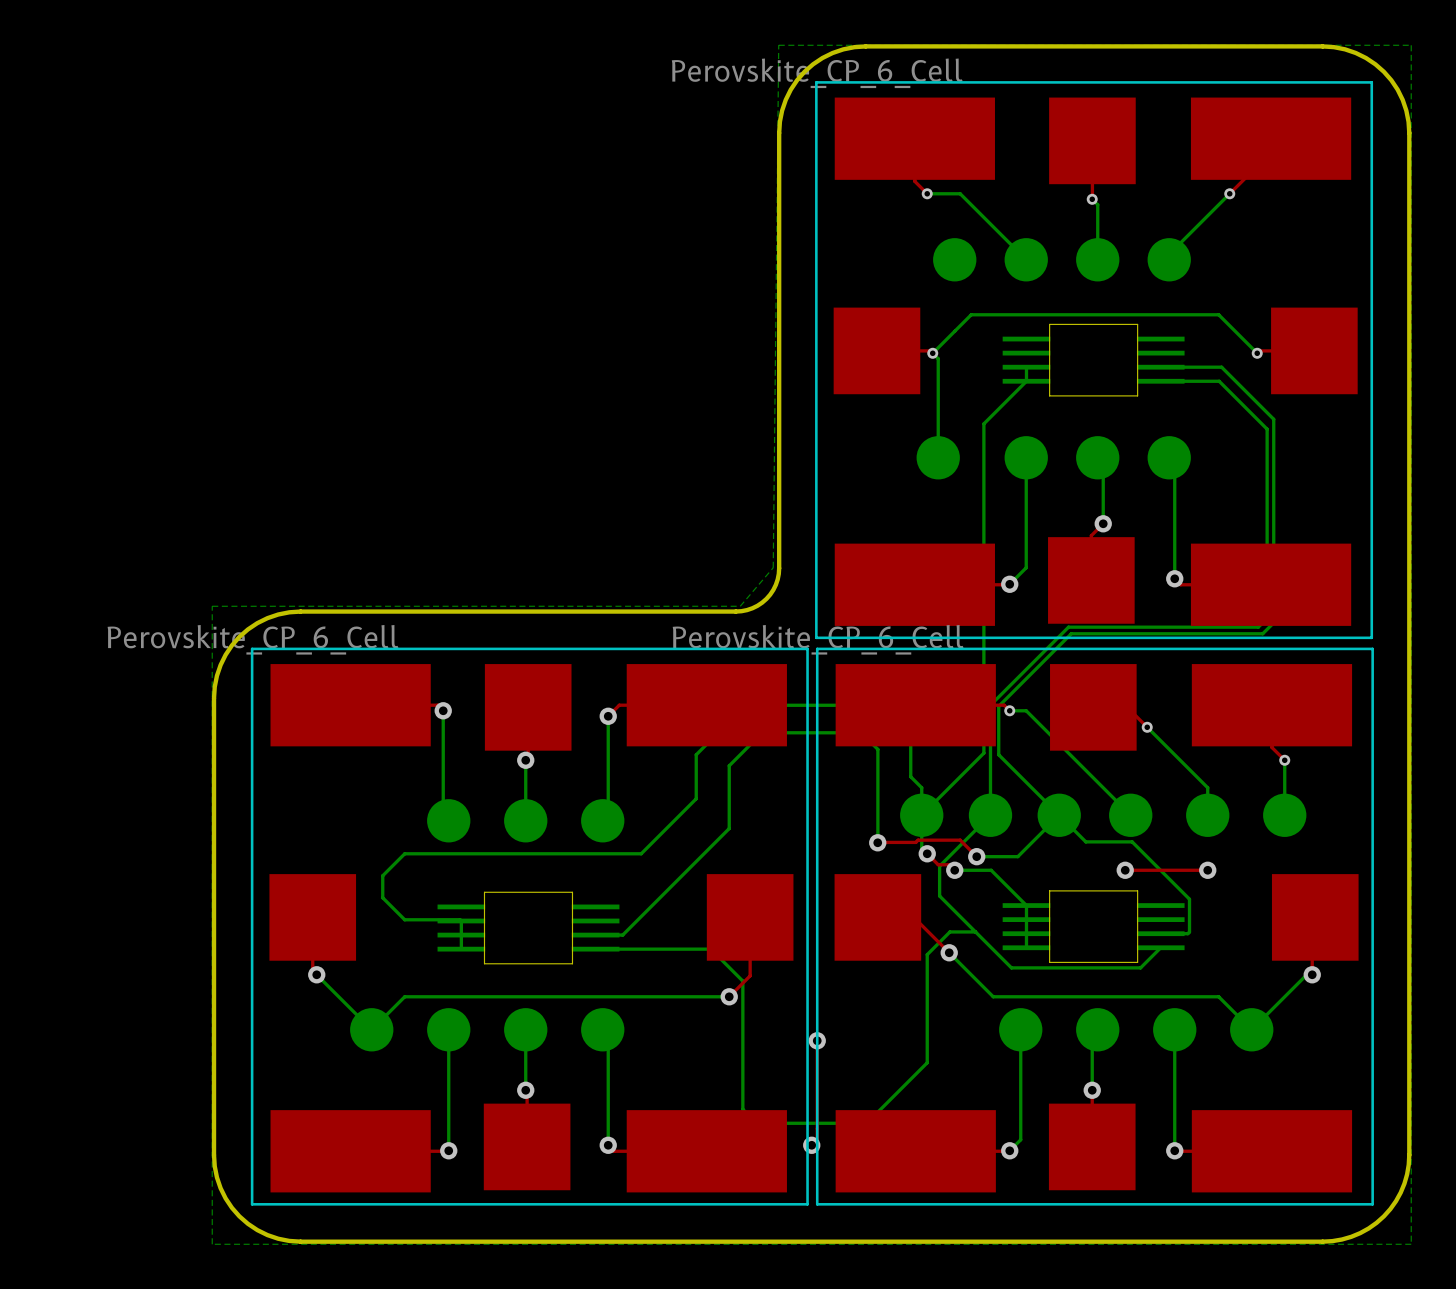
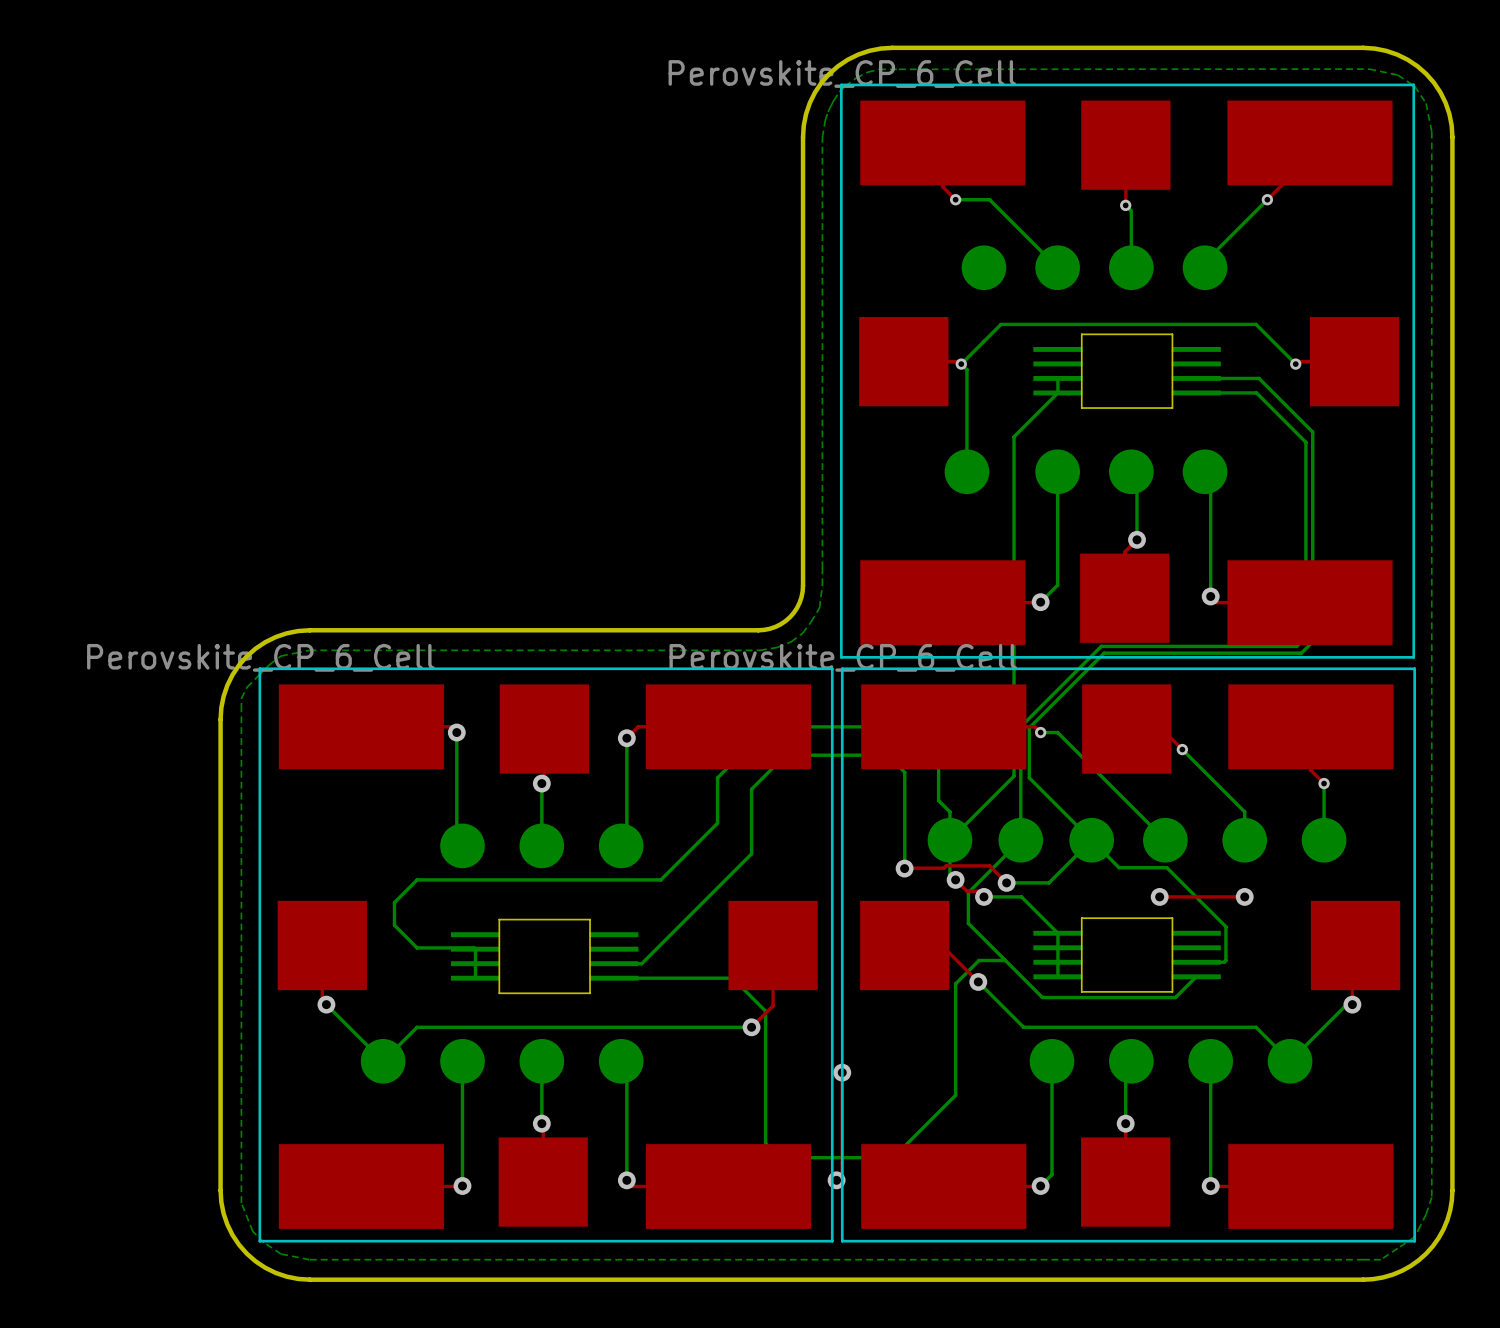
bottom zone outline: (778, 45) (773, 567) (740, 606) (212, 606) (212, 1244) (1411, 1244) (1411, 45) (778, 45) -> (1369, 69) (879, 69) (856, 77) (839, 92) (833, 100) (825, 120) (822, 137) (822, 585) (819, 607) (802, 633) (791, 641) (777, 647) (760, 650) (309, 650) (281, 656) (247, 687) (241, 698) (241, 1203) (252, 1231) (264, 1242) (281, 1254) (309, 1259) (1380, 1259) (1414, 1237) (1431, 1197) (1431, 131) (1426, 103) (1414, 86) (1397, 75) (1369, 69)

